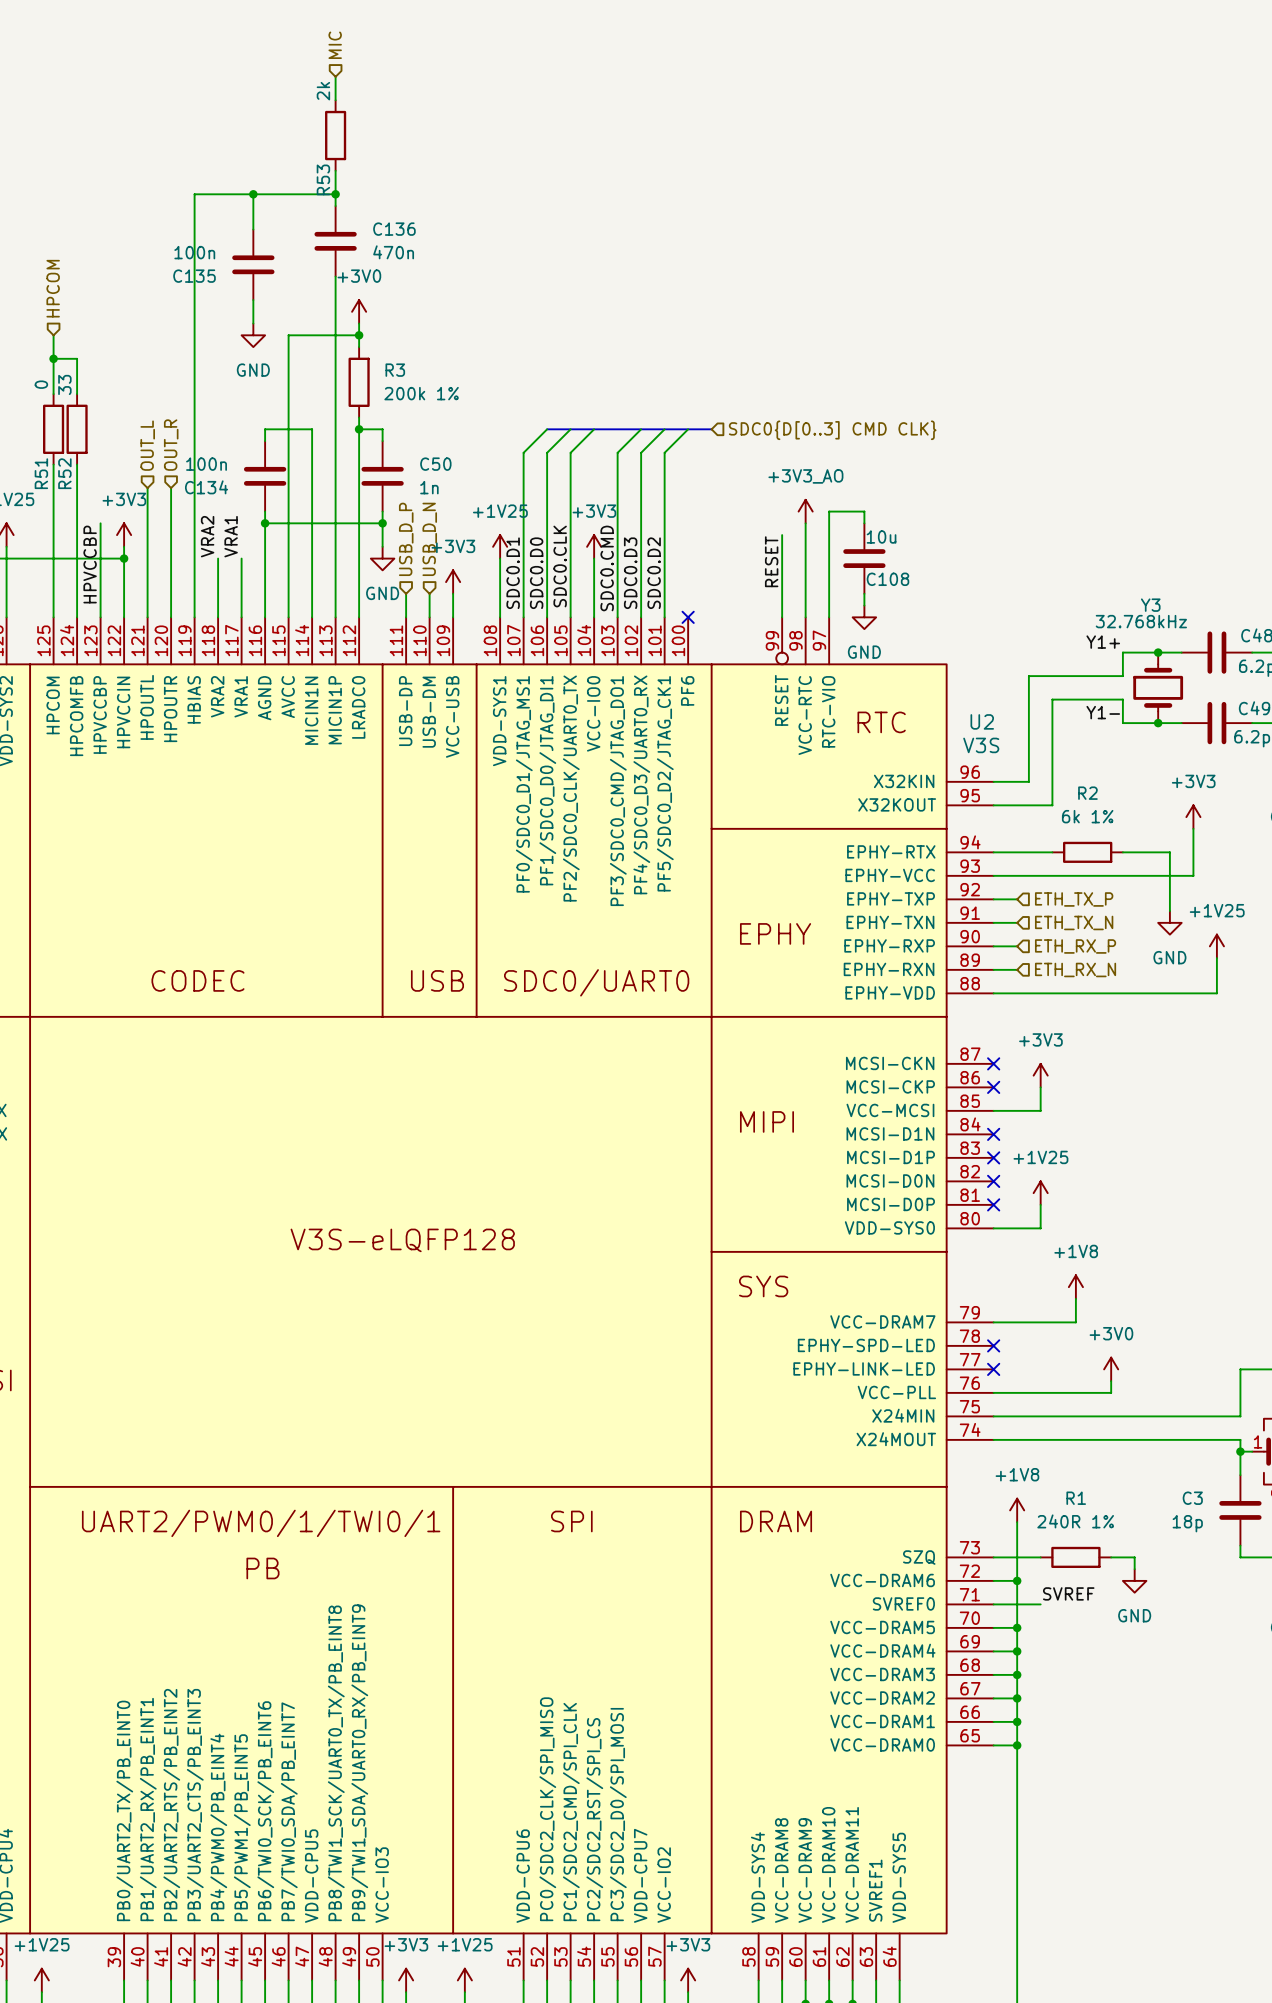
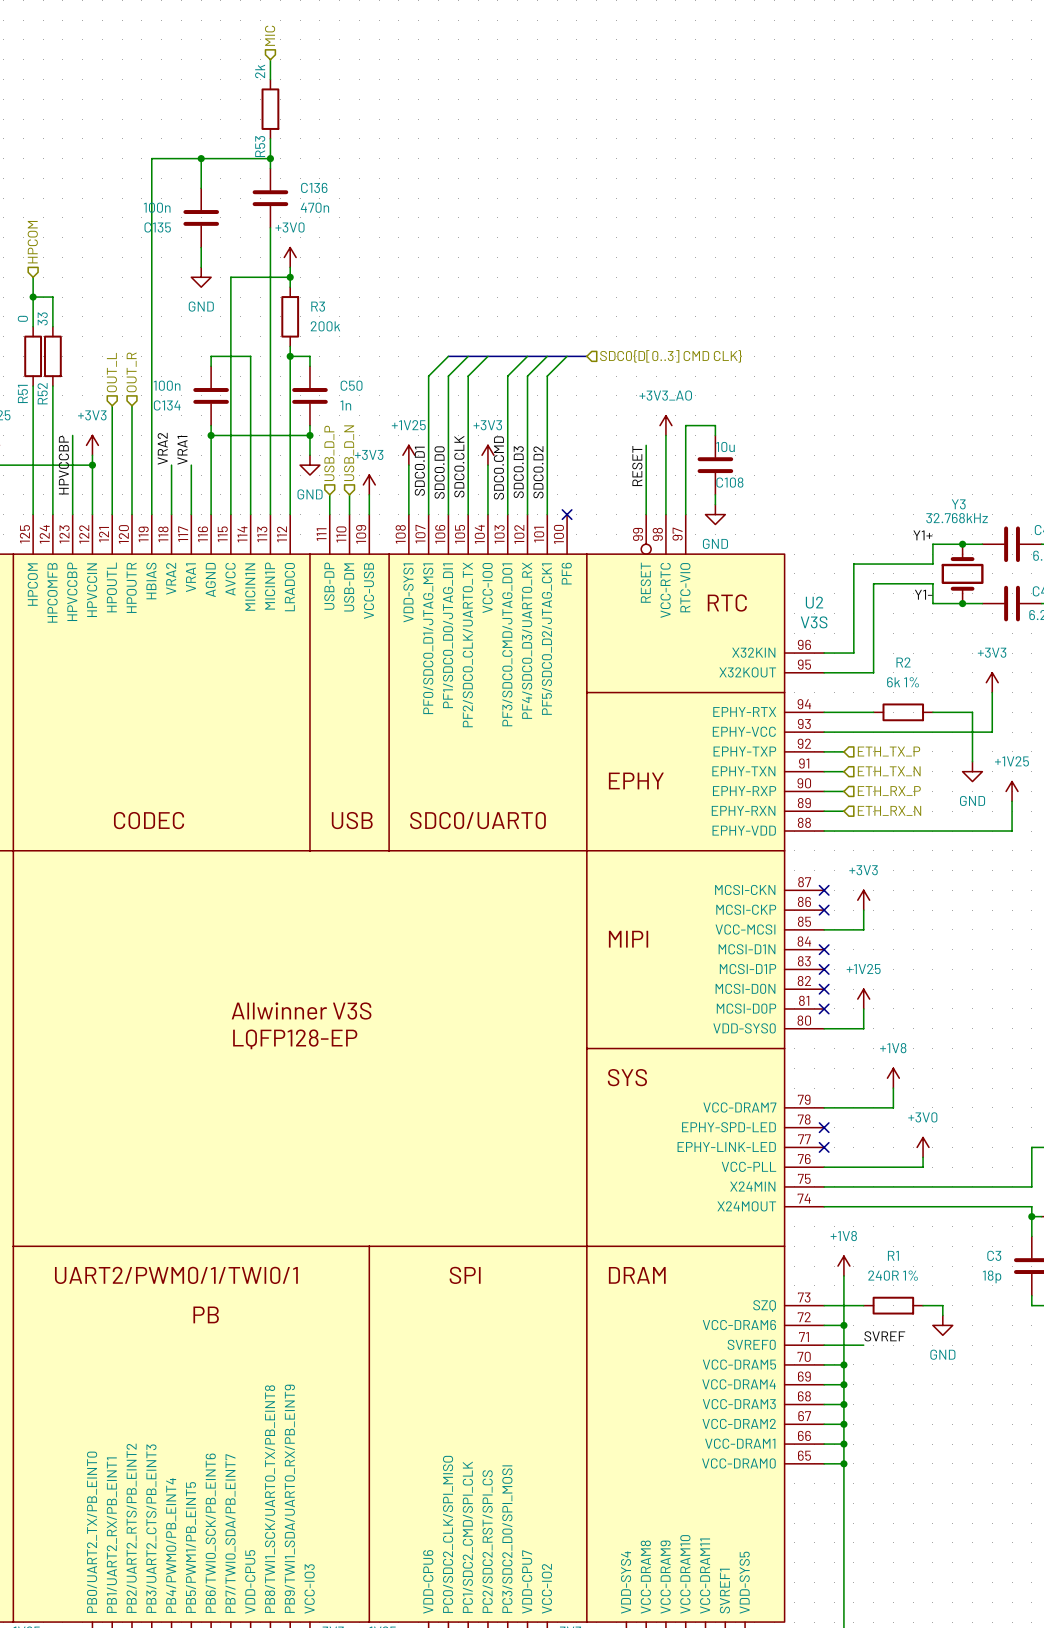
R3 value: 200k 1% (421, 393) -> 200k (325, 326)
U2 text: none -> Allwinner V3S (301, 1011)
U2 text: V3S-eLQFP128 (402, 1240) -> LQFP128-EP (295, 1039)

